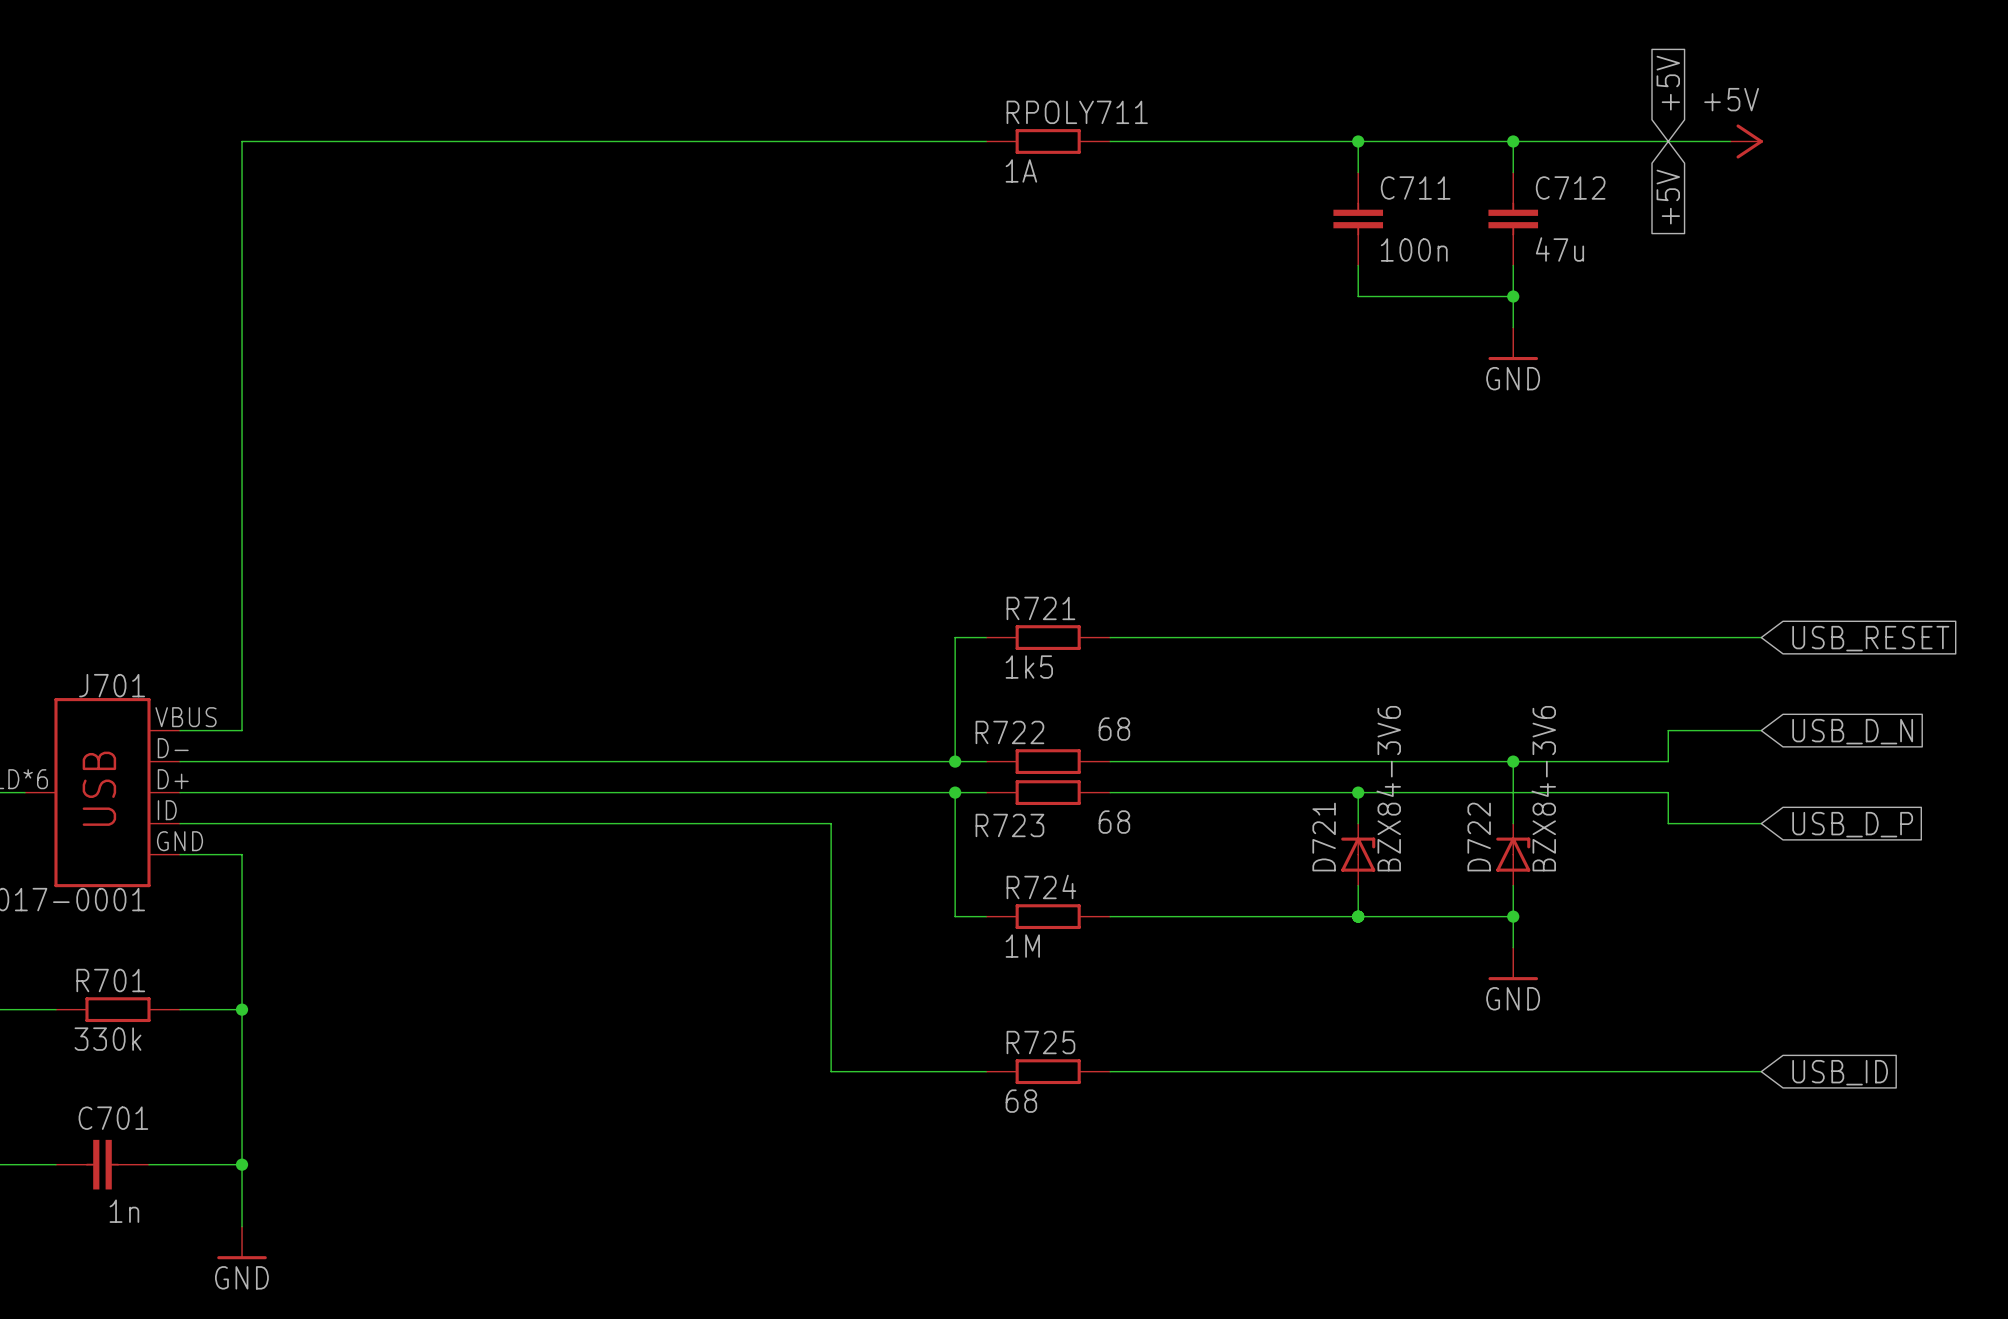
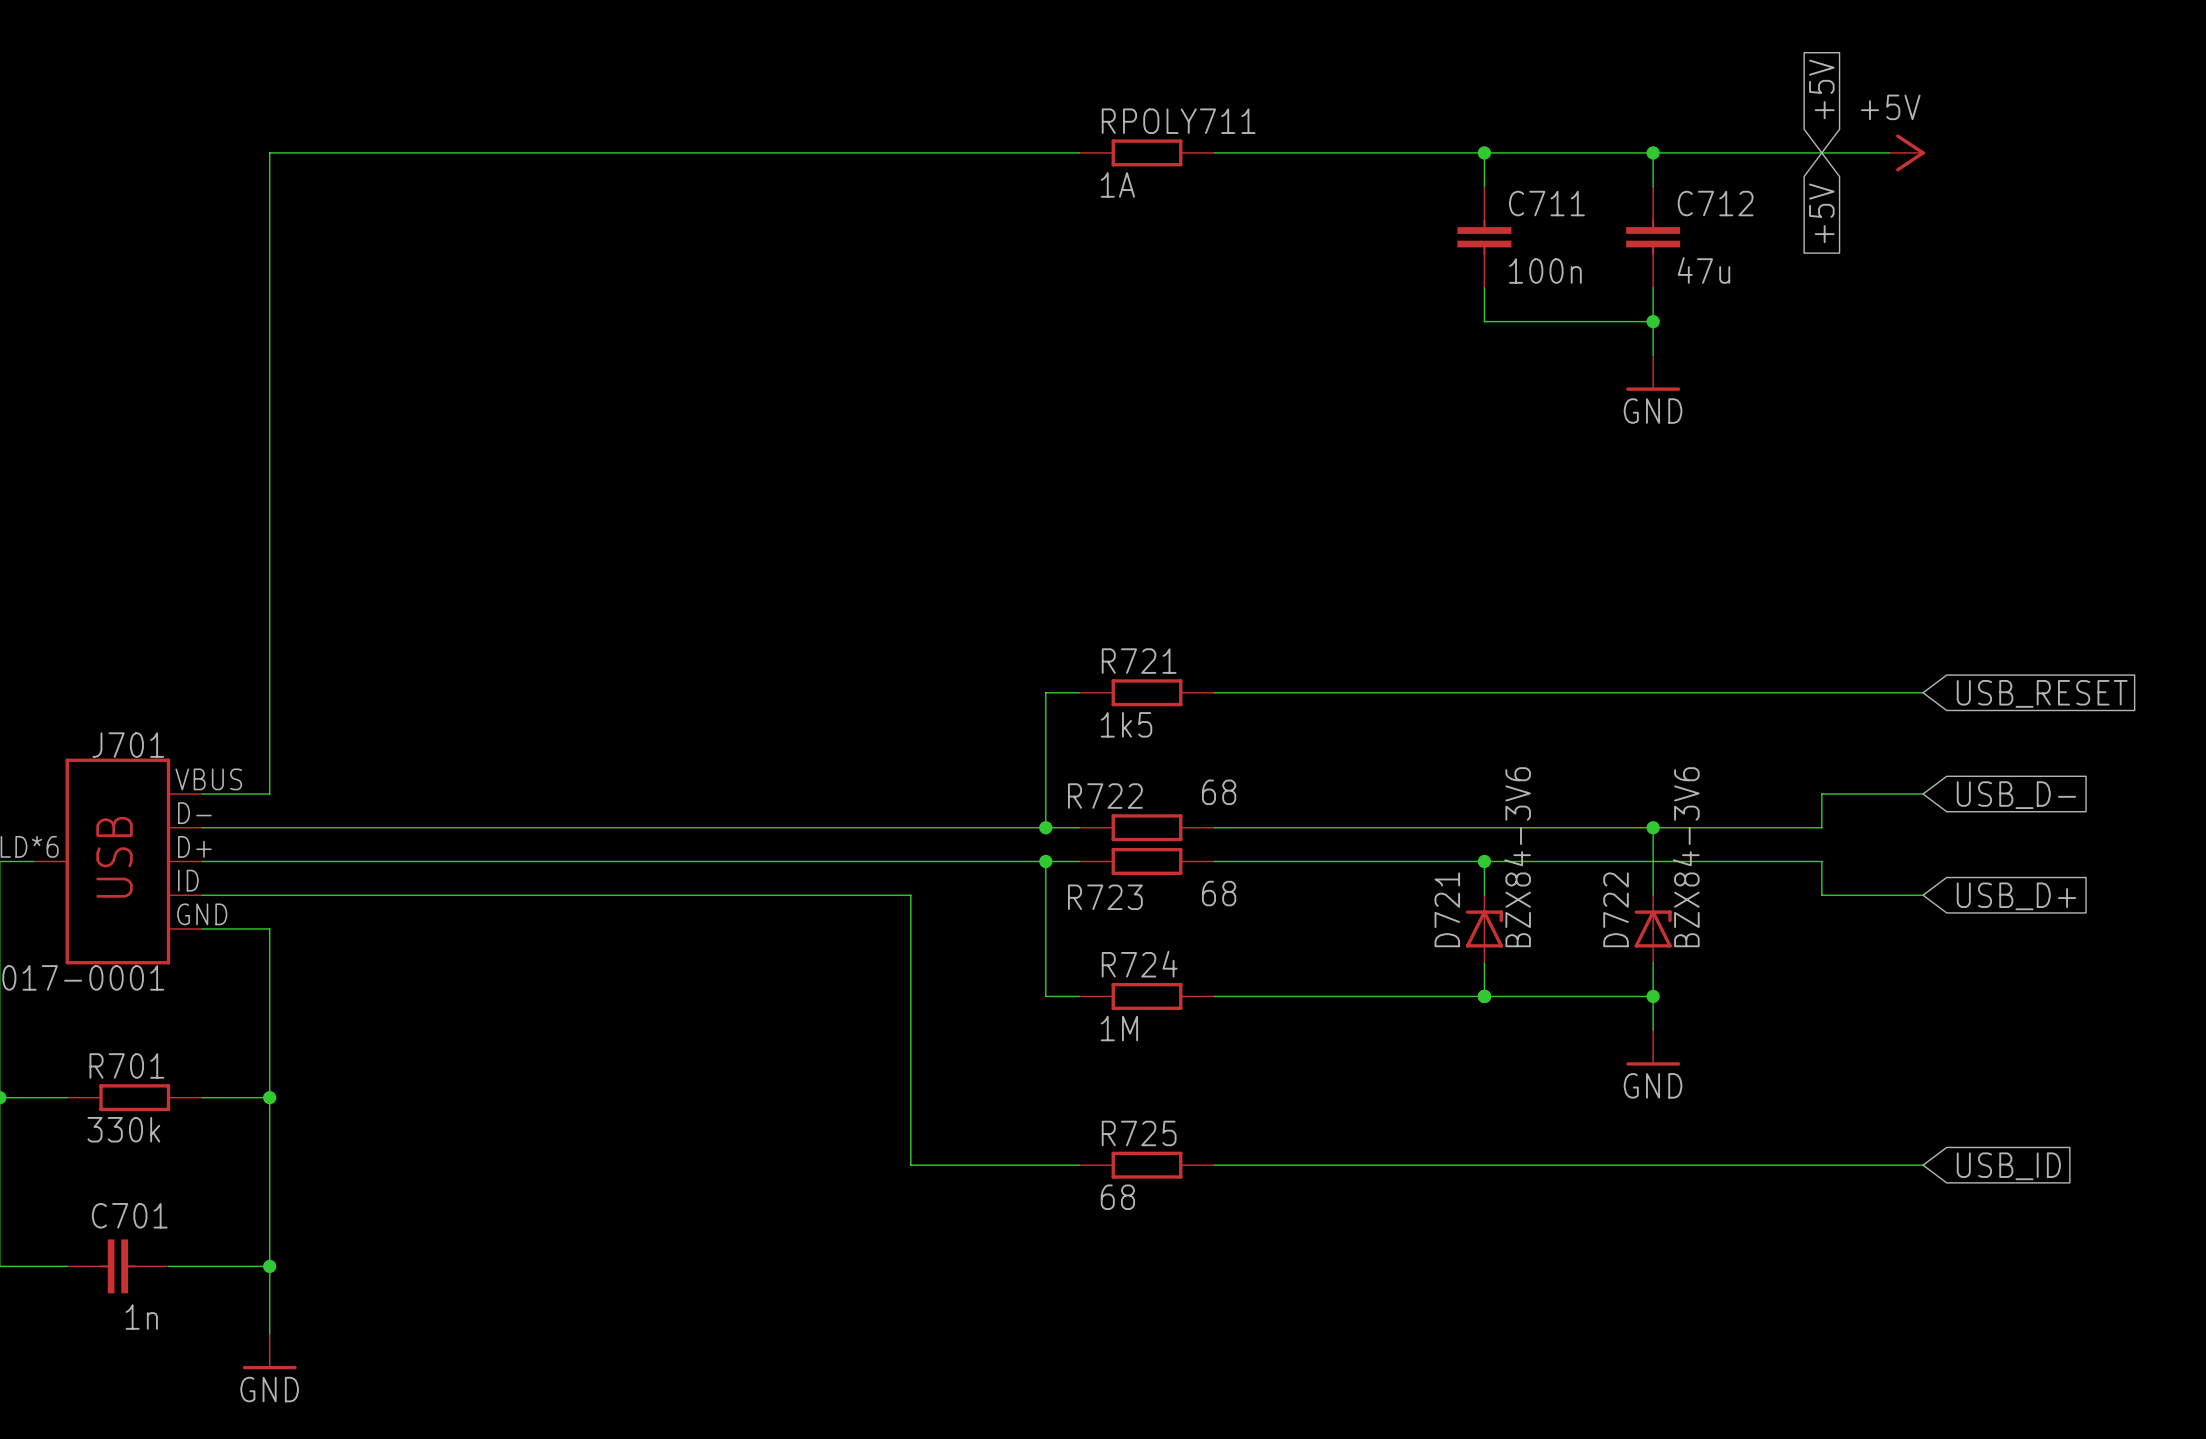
global label: USB_D_N (1852, 731) -> USB_D- (2016, 795)
global label: USB_D_P (1852, 824) -> USB_D+ (2016, 896)

